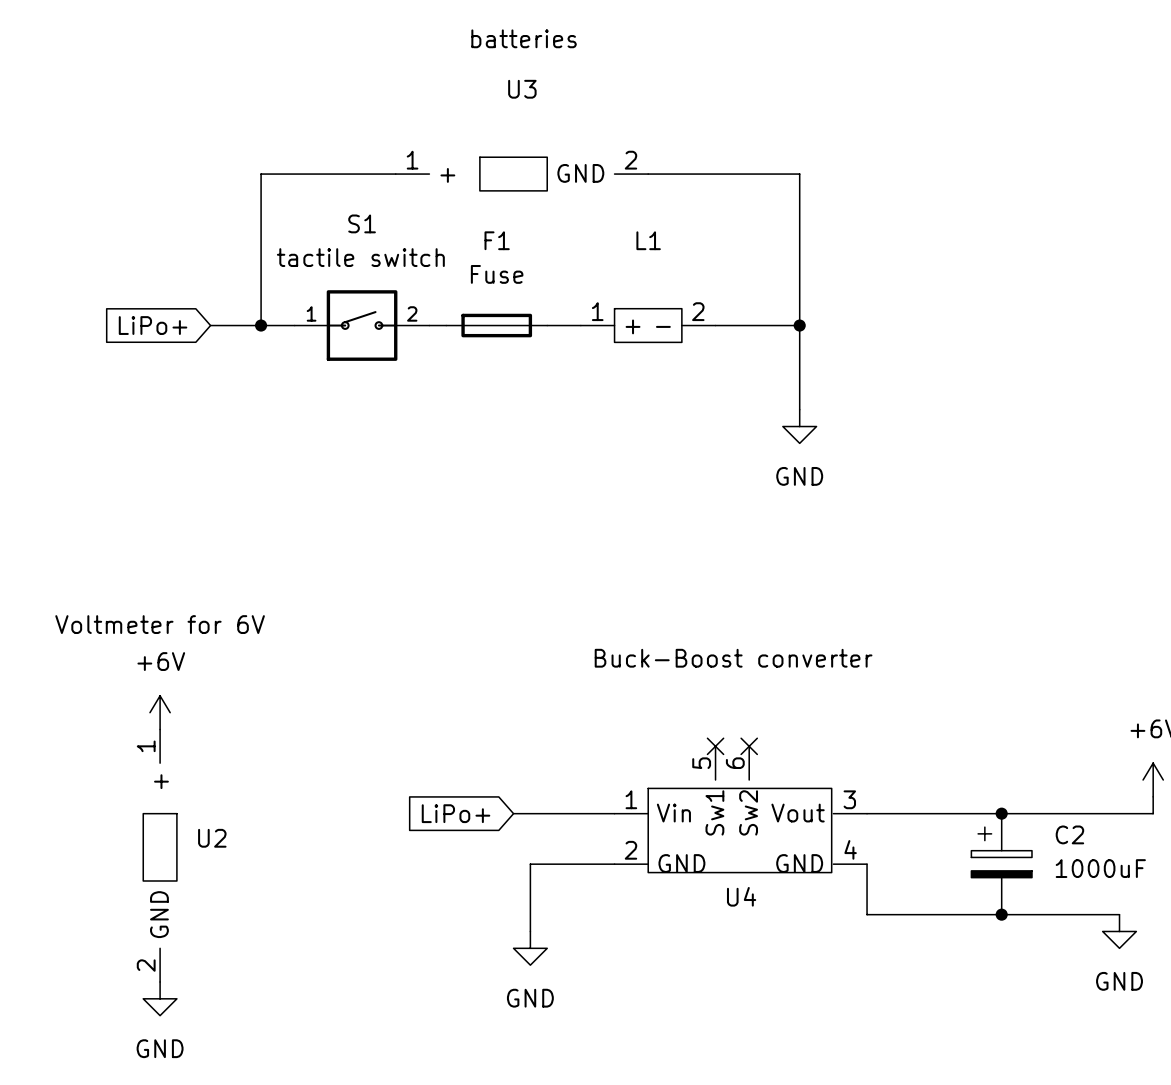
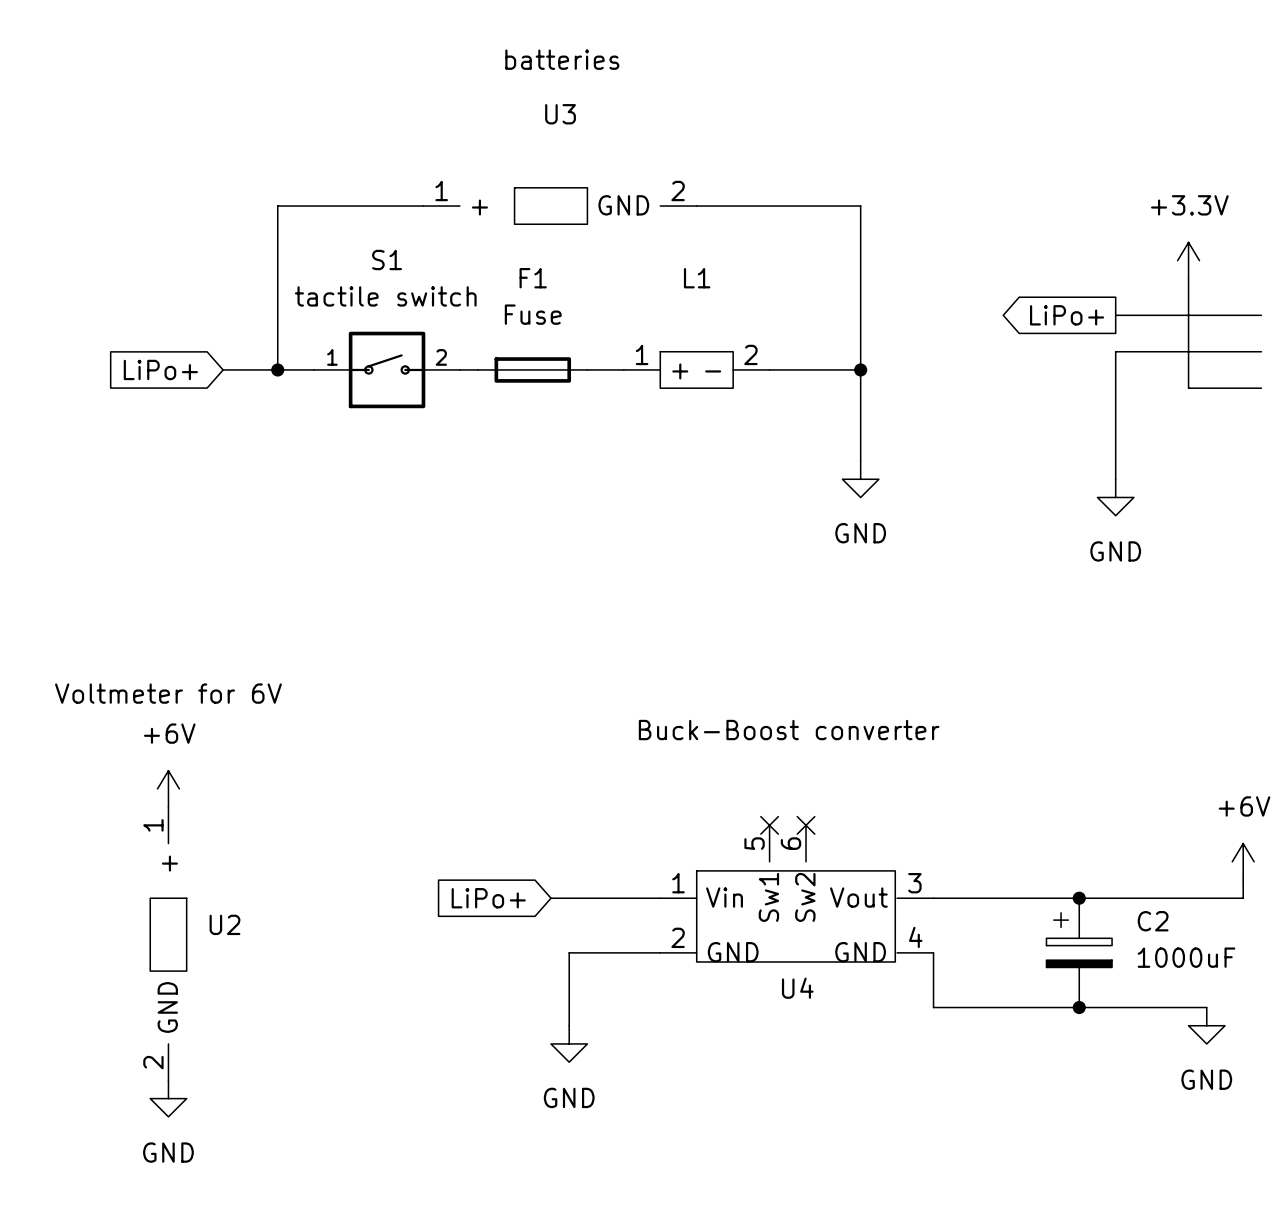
power symbol: none -> +3.3V (1188, 260)
wire: none -> (1188, 278) (1188, 388) (1261, 388)
global label: none -> LiPo+ (1067, 315)
wire: none -> (1115, 315) (1261, 315)
wire: none -> (1261, 351) (1115, 351) (1115, 479)
power symbol: none -> GND (1115, 497)

